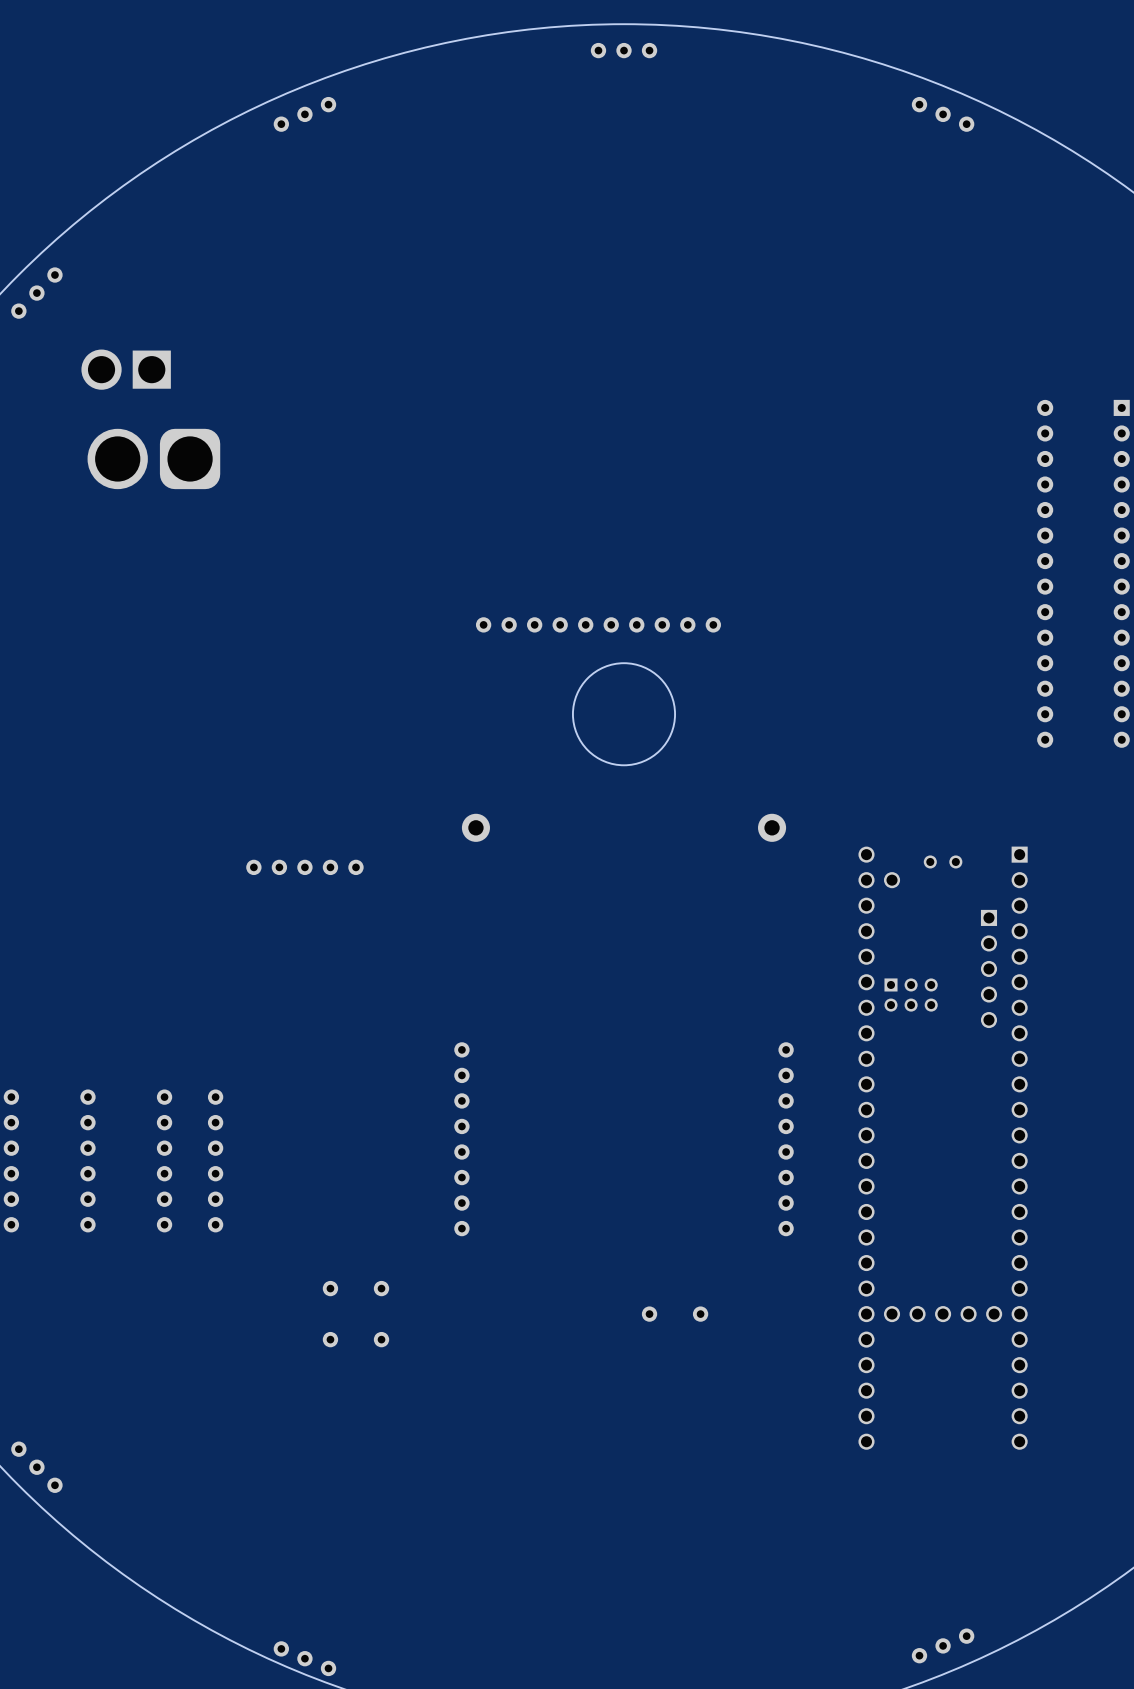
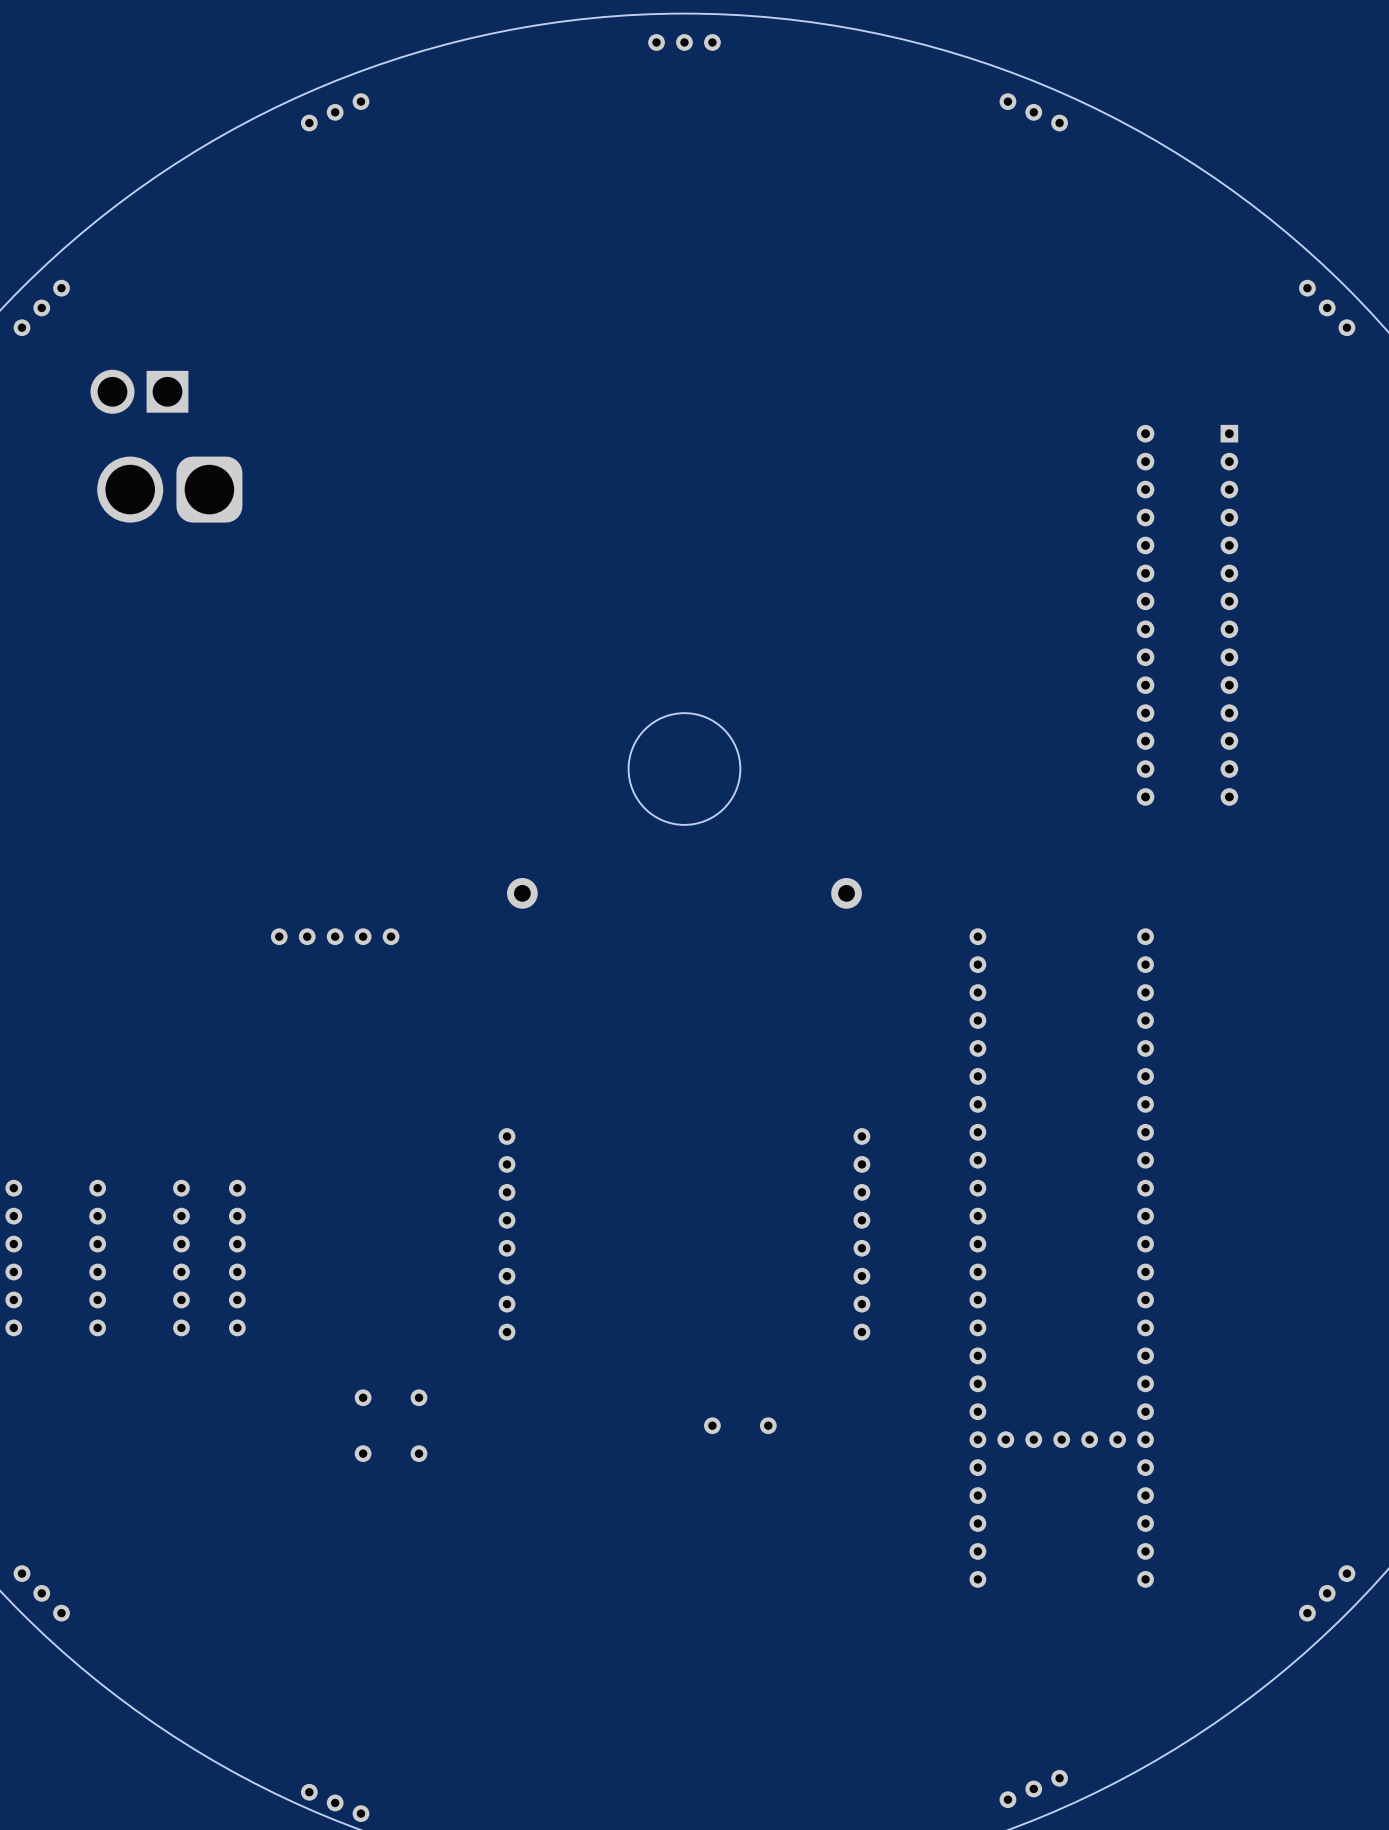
part: (598, 624) -> none
part: (943, 1148) -> none
part: none -> (1061, 1258)

